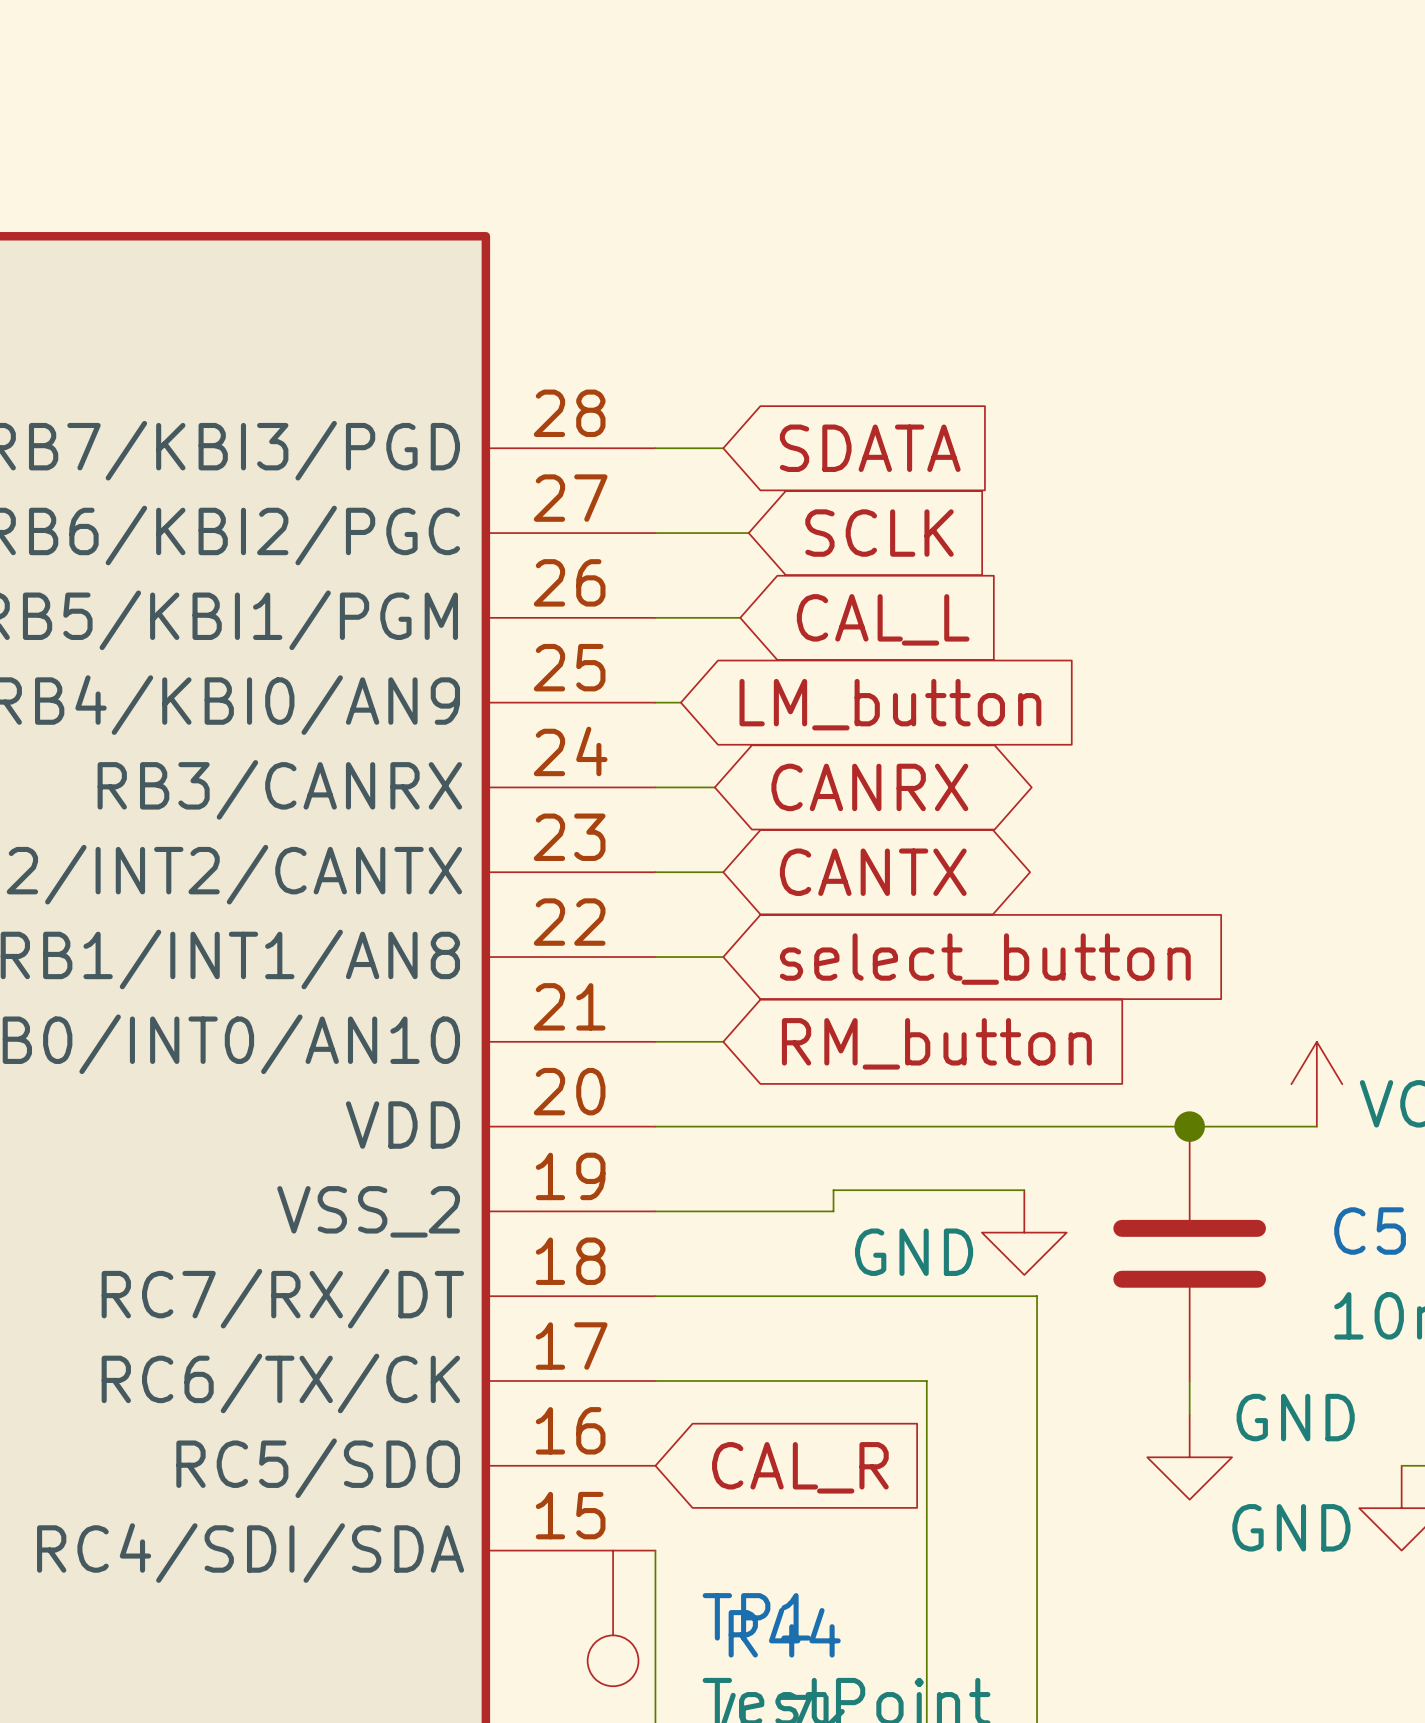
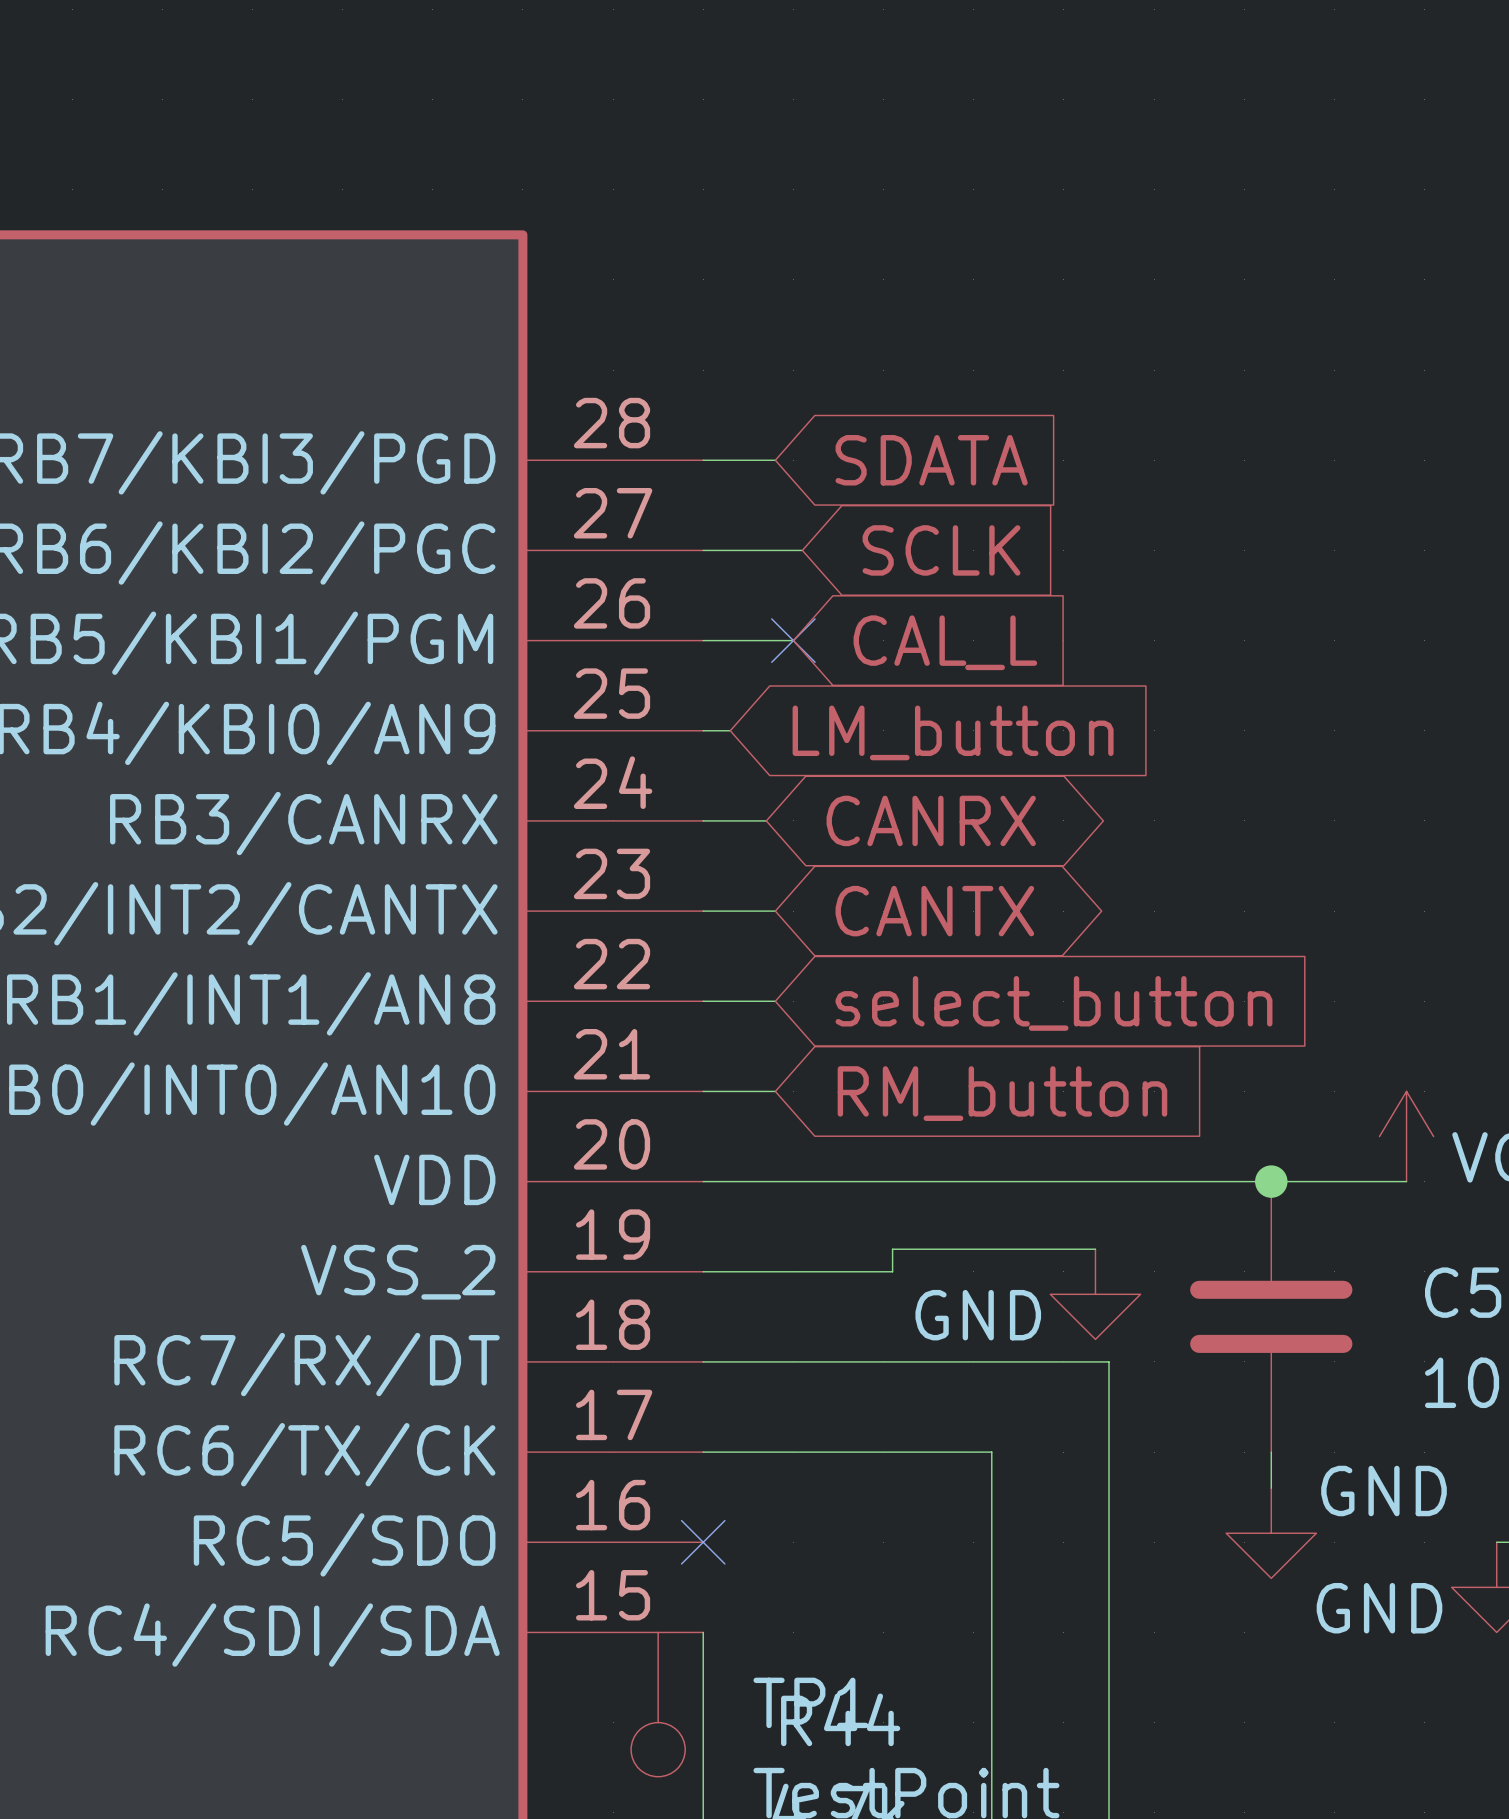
no-connect mark: none -> (793, 640)
no-connect mark: none -> (703, 1542)
global label: CAL_R (800, 1467) -> none

